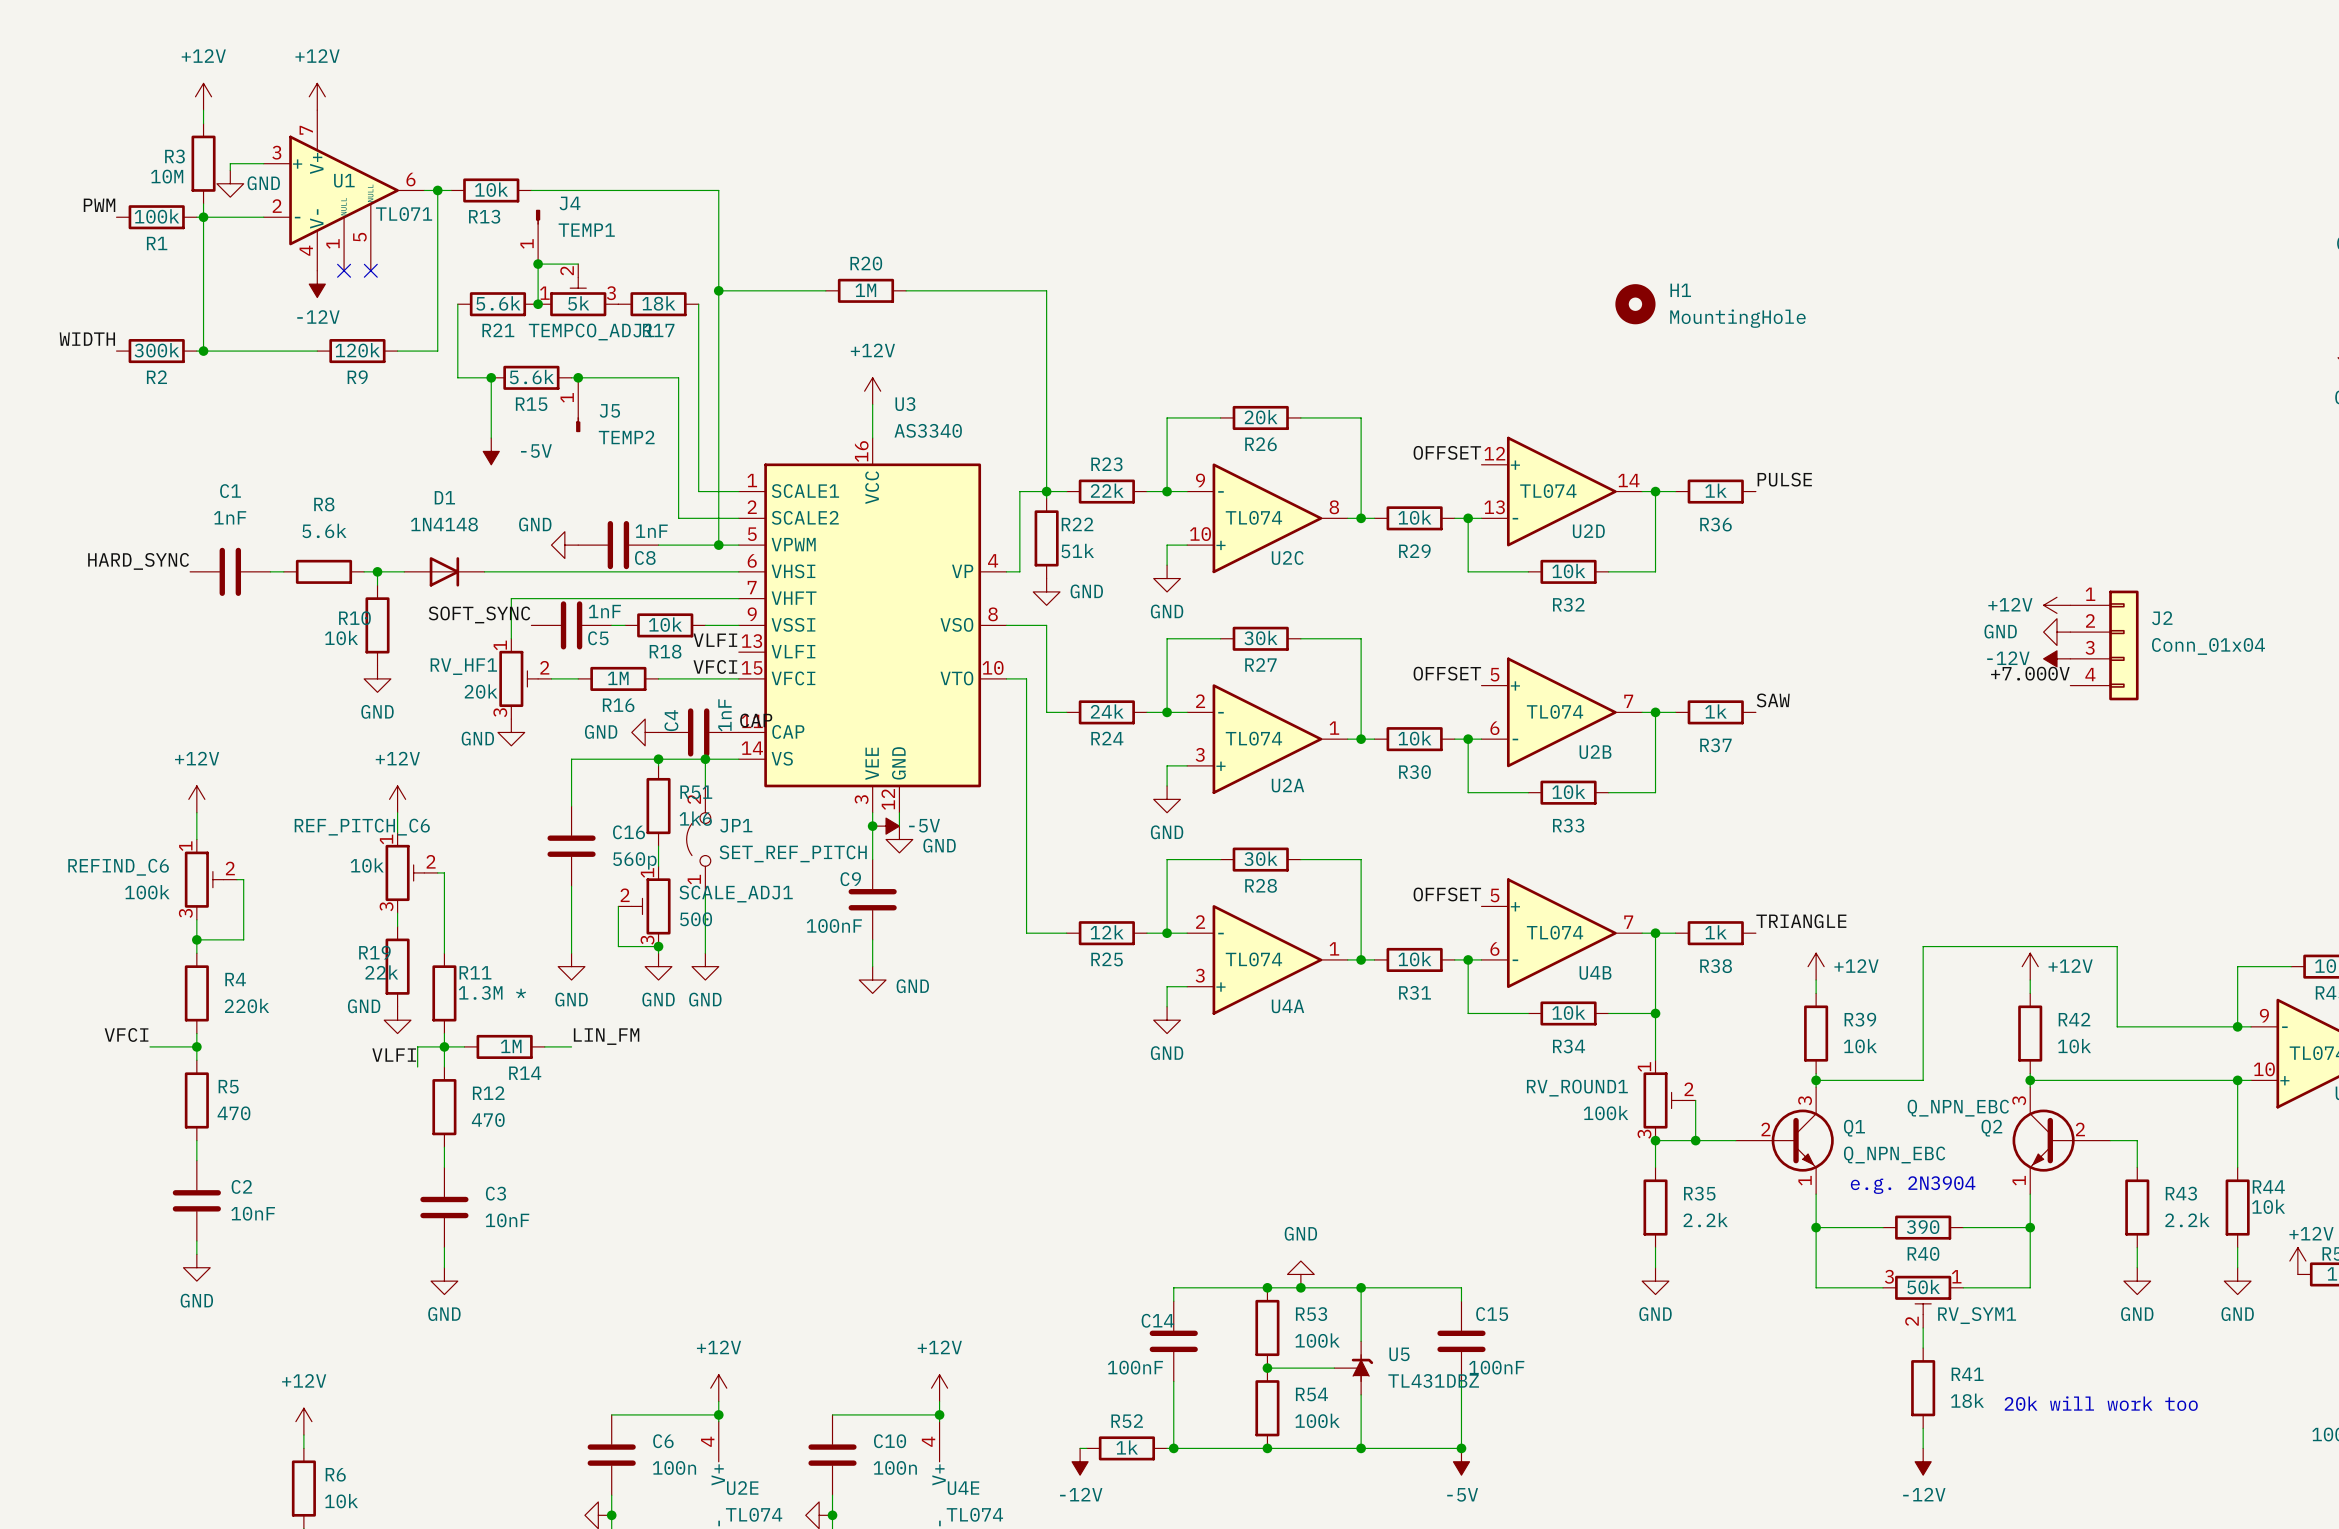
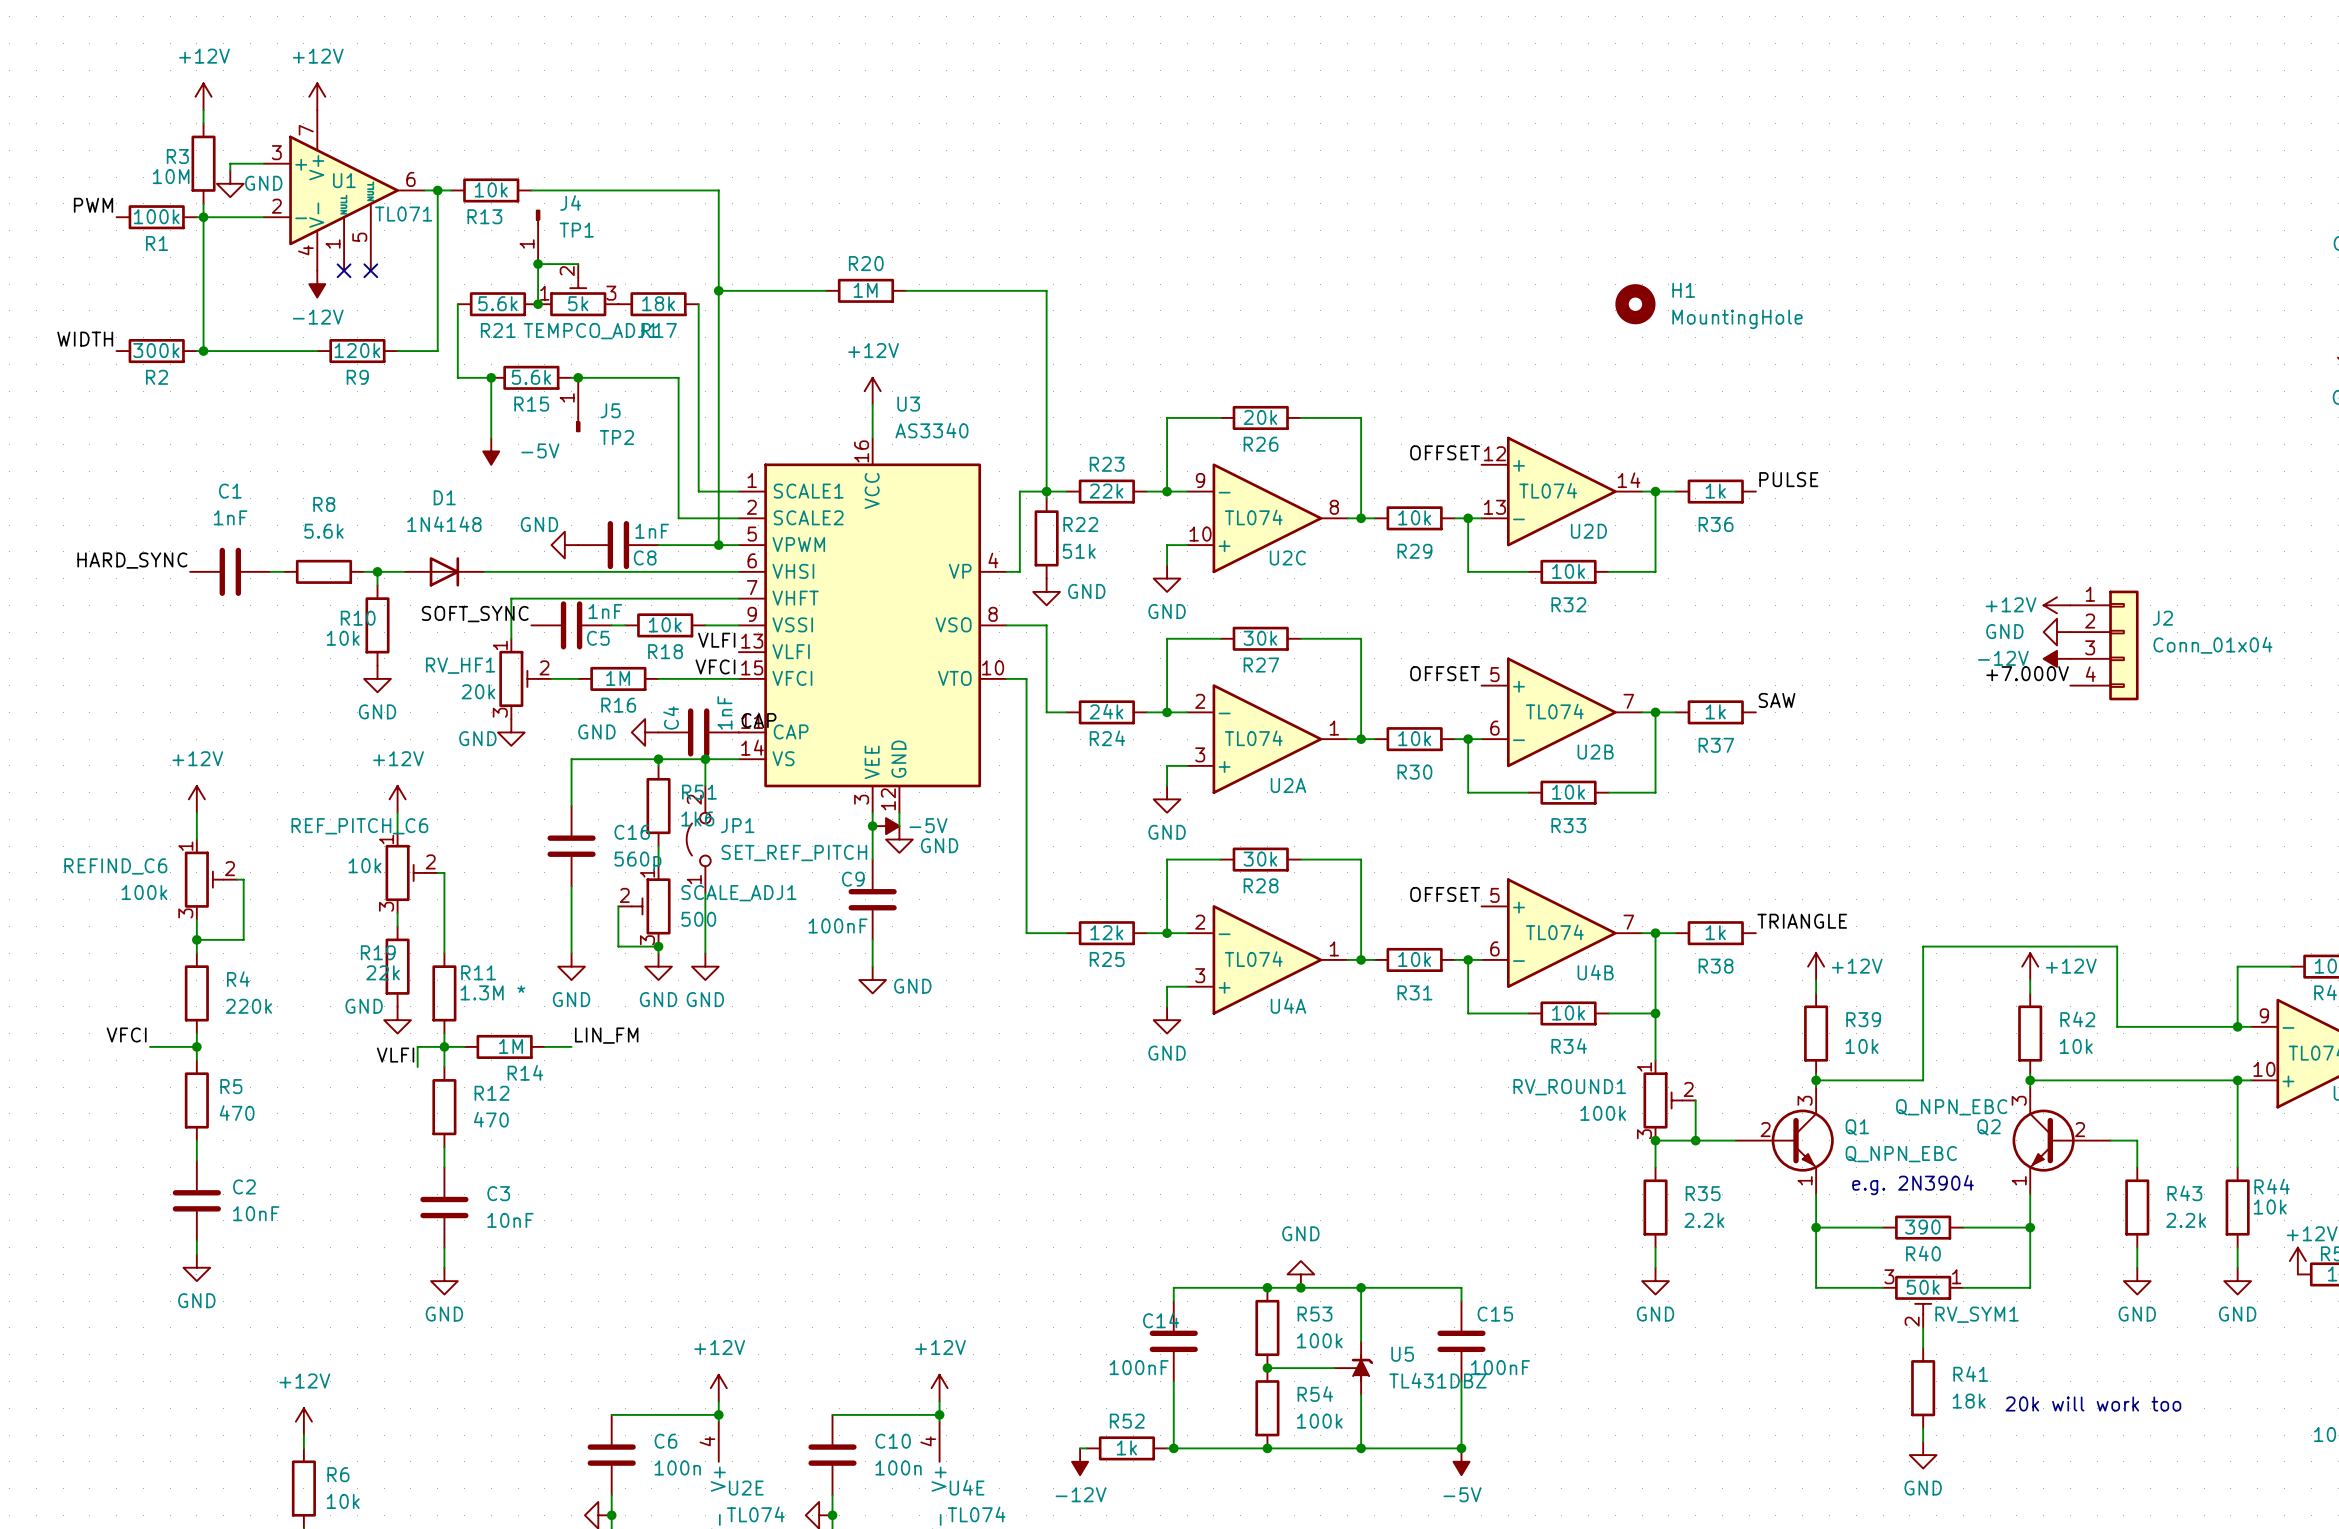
J4 value: TEMP1 (586, 230) -> TP1 (576, 230)
J5 value: TEMP2 (626, 437) -> TP2 (616, 437)
power symbol: -12V (1923, 1461) -> GND (1923, 1455)

